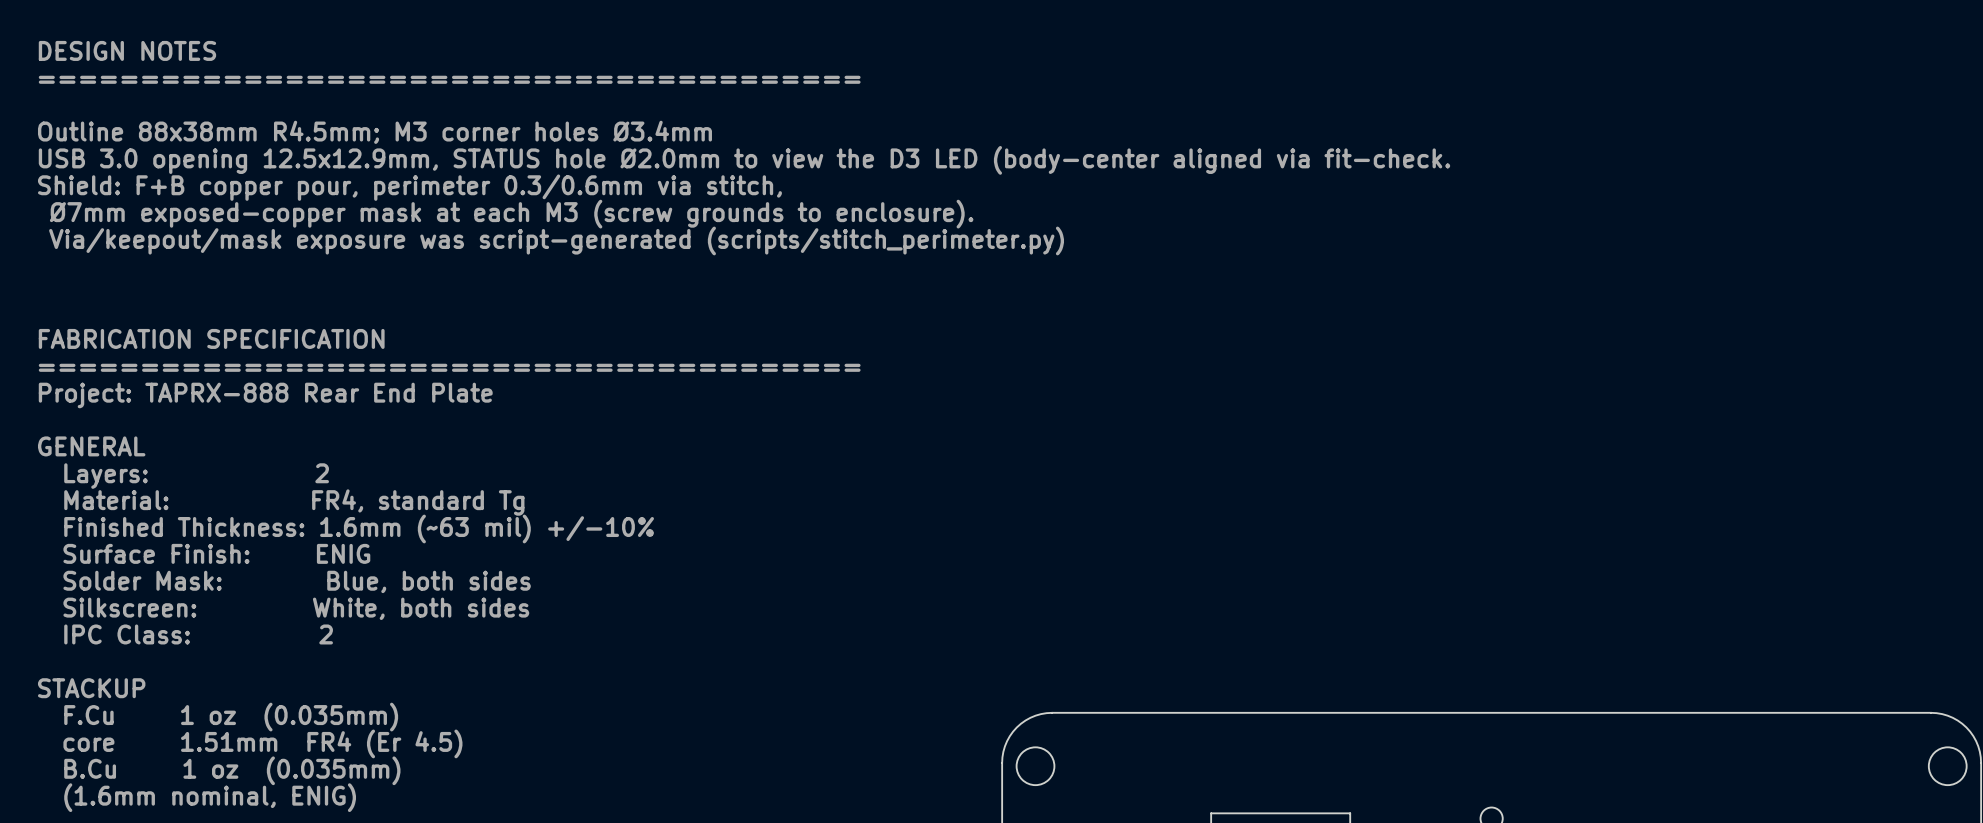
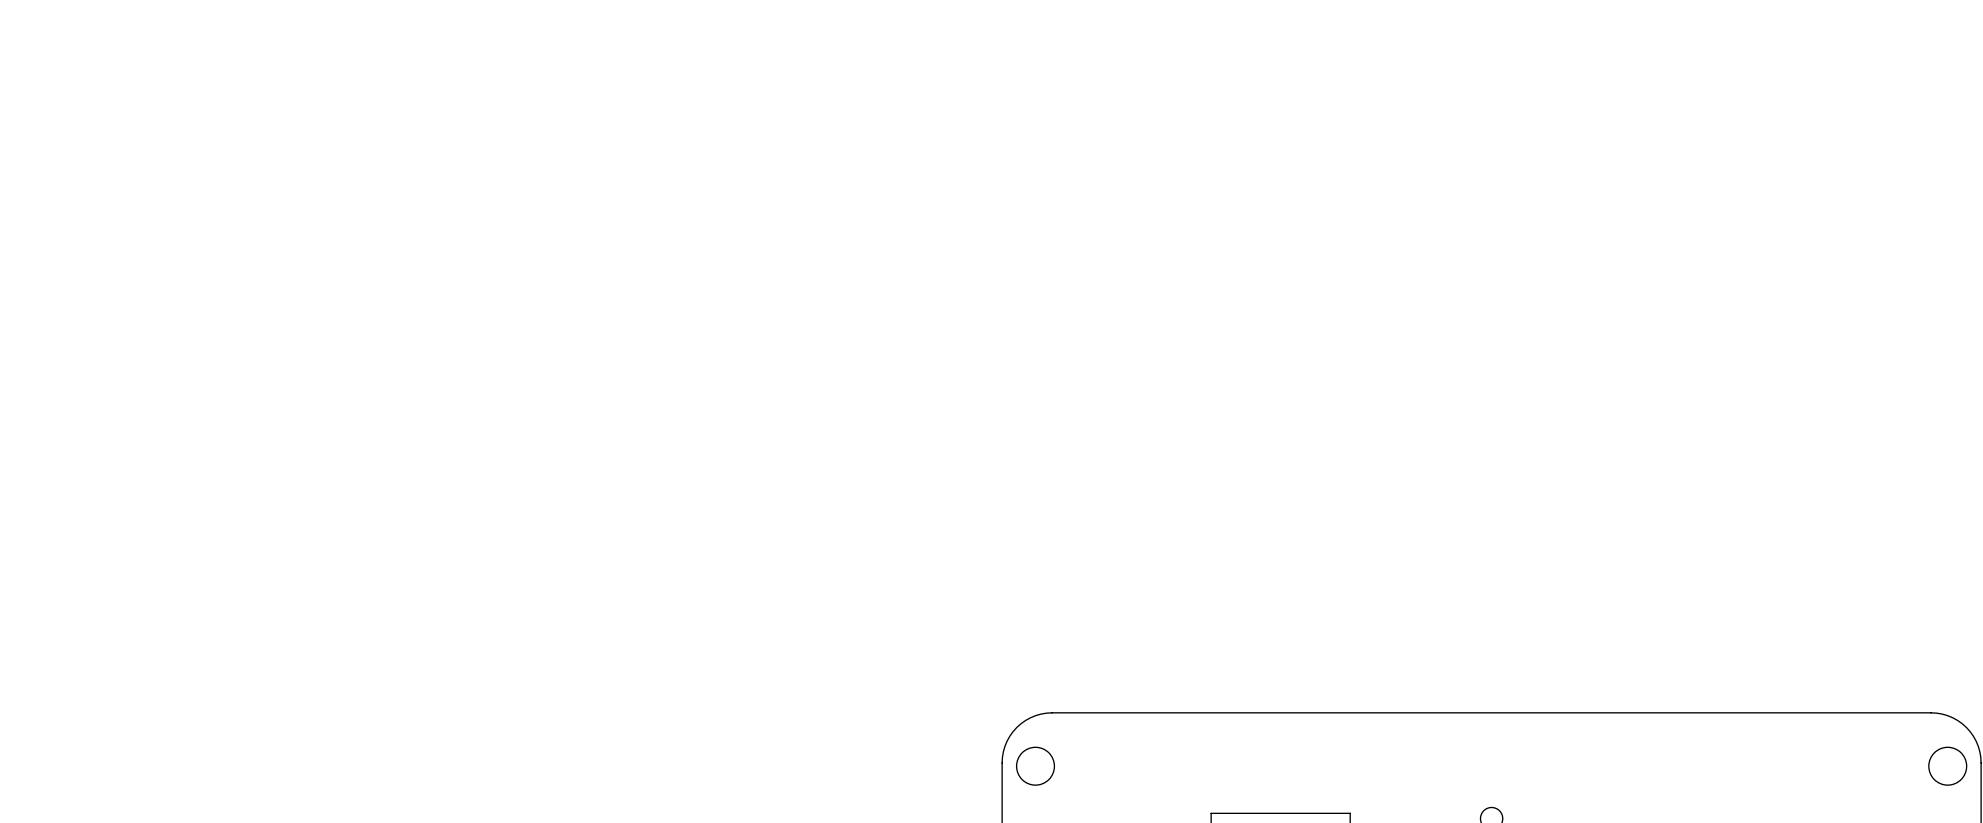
text: DESIGN NOTES (127, 50) -> none
text: ======================================== (449, 79) -> none
text: Outline 88x38mm R4.5mm; M3 corner holes Ø3.4mm (374, 132) -> none
text: USB 3.0 opening 12.5x12.9mm, STATUS hole Ø2.0mm to view the D3 LED (body-center aligned via fit-check. (744, 160) -> none
text: Shield: F+B copper pour, perimeter 0.3/0.6mm via stitch, (409, 187) -> none
text: Ø7mm exposed-copper mask at each M3 (screw grounds to enclosure). (511, 214) -> none
text: Via/keepout/mask exposure was script-generated (scripts/stitch_perimeter.py) (556, 240) -> none
text: FABRICATION SPECIFICATION (211, 338) -> none
text: ======================================== (449, 367) -> none
text: Project: TAPRX-888 Rear End Plate (265, 395) -> none
text: GENERAL (91, 446) -> none
text: Layers: 2 (196, 476) -> none
text: Material: FR4, standard Tg (294, 502) -> none
text: Finished Thickness: 1.6mm (~63 mil) +/-10% (359, 528) -> none
text: Surface Finish: ENIG (216, 553) -> none
text: Solder Mask: Blue, both sides (297, 581) -> none
text: Silkscreen: White, both sides (296, 608) -> none
text: IPC Class: 2 (198, 634) -> none
text: STACKUP (91, 688) -> none
text: F.Cu 1 oz (0.035mm) (231, 717) -> none
text: core 1.51mm FR4 (Er 4.5) (262, 743) -> none
text: B.Cu 1 oz (0.035mm) (232, 770) -> none
text: (1.6mm nominal, ENIG) (210, 797) -> none

